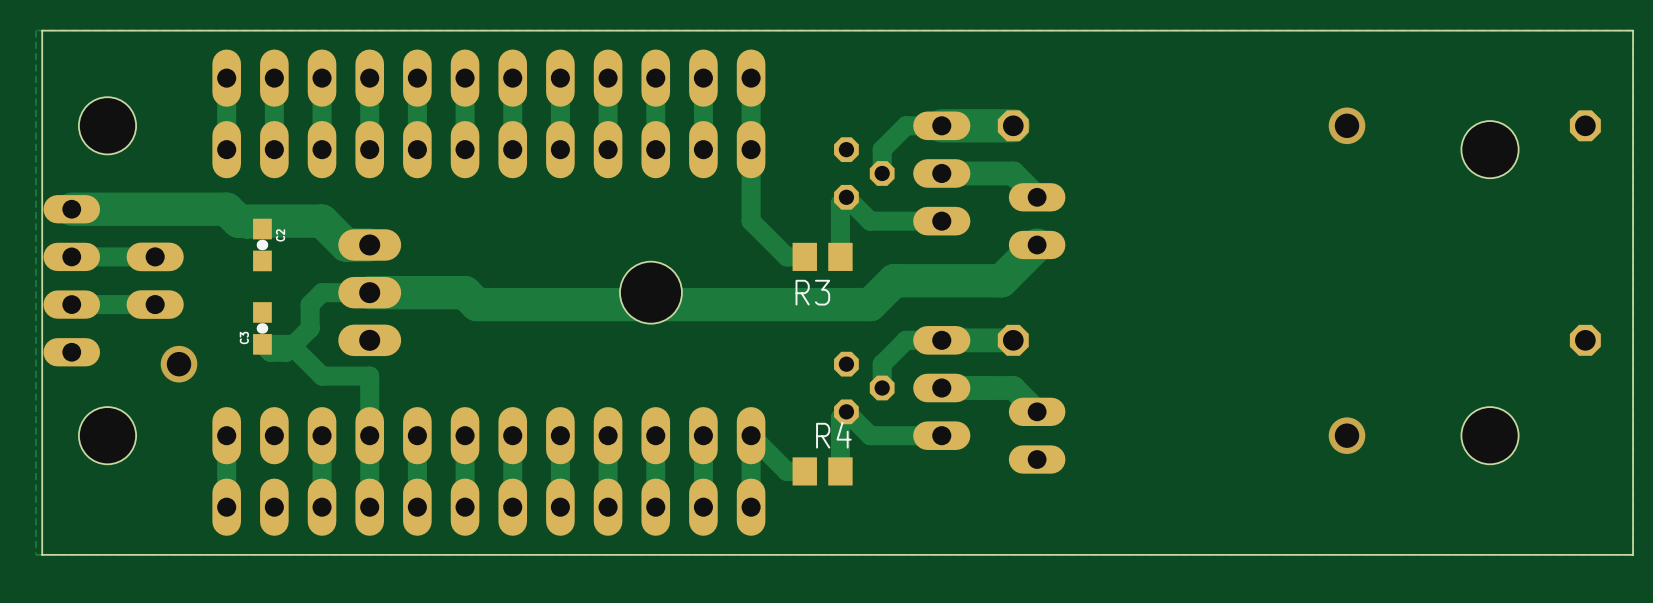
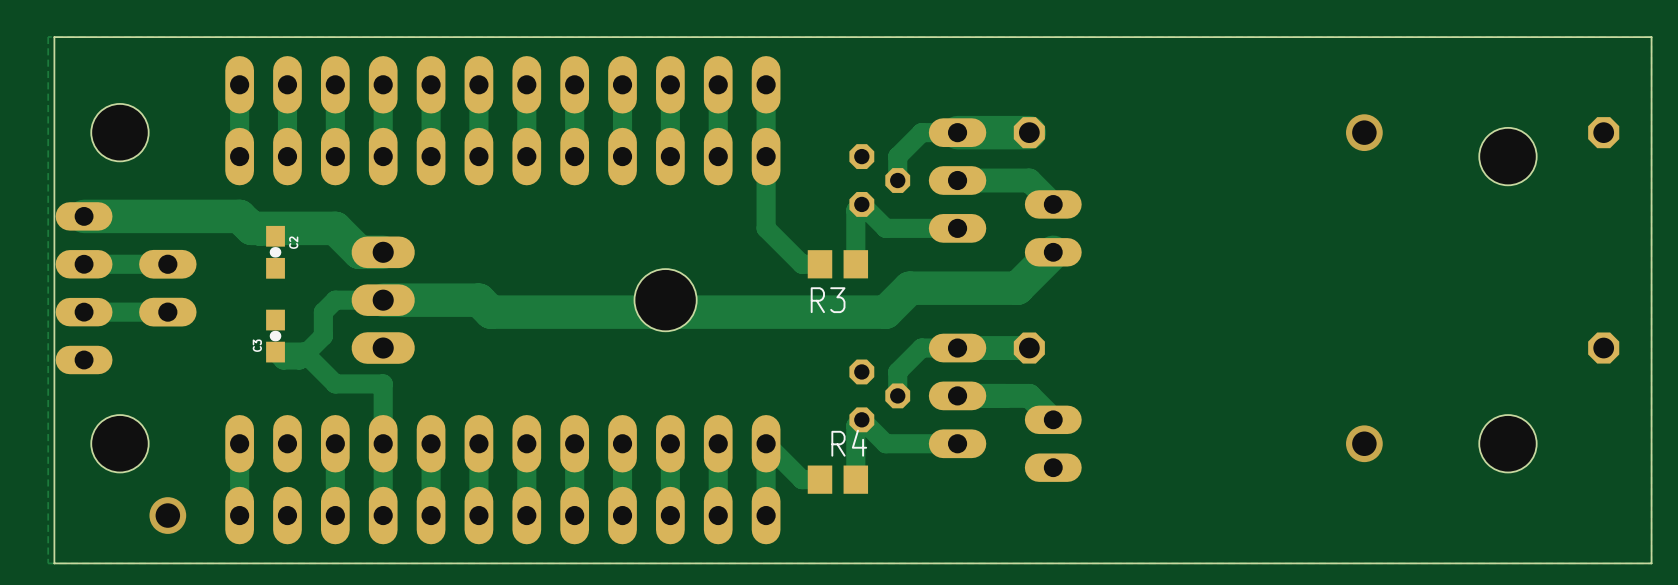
via: (179, 364) -> none
via: none -> (167, 515)

